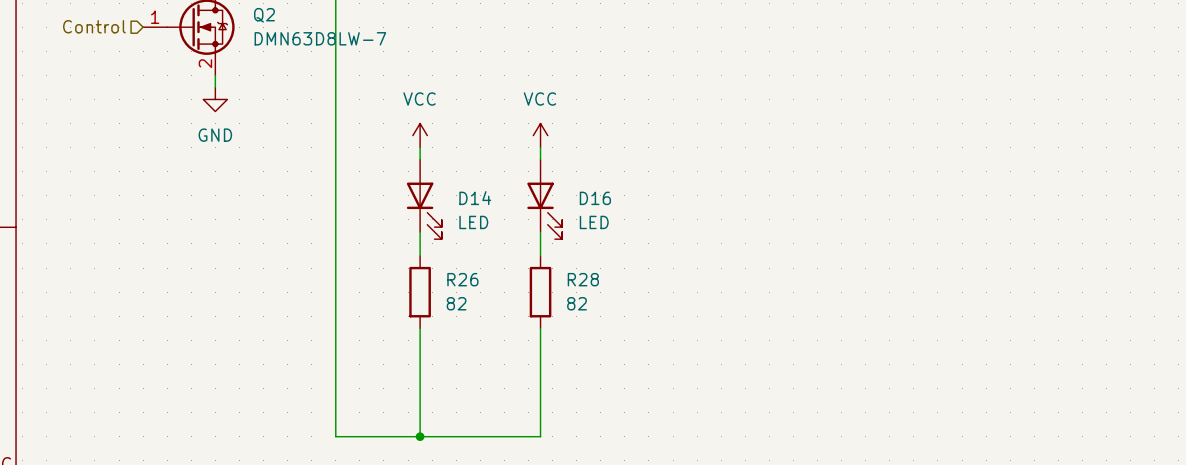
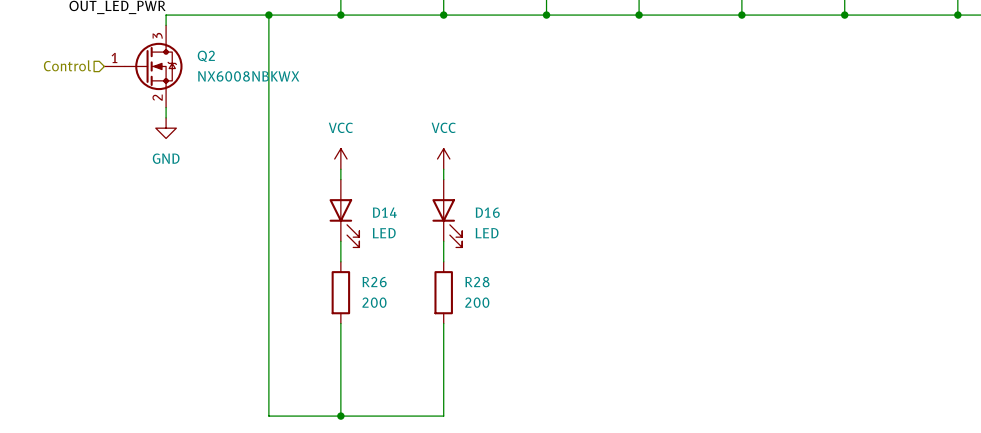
Q2 value: DMN63D8LW-7 (320, 38) -> NX6008NBKWX (248, 76)
R26 value: 82 (456, 303) -> 200 (374, 302)
R28 value: 82 (577, 303) -> 200 (477, 302)

